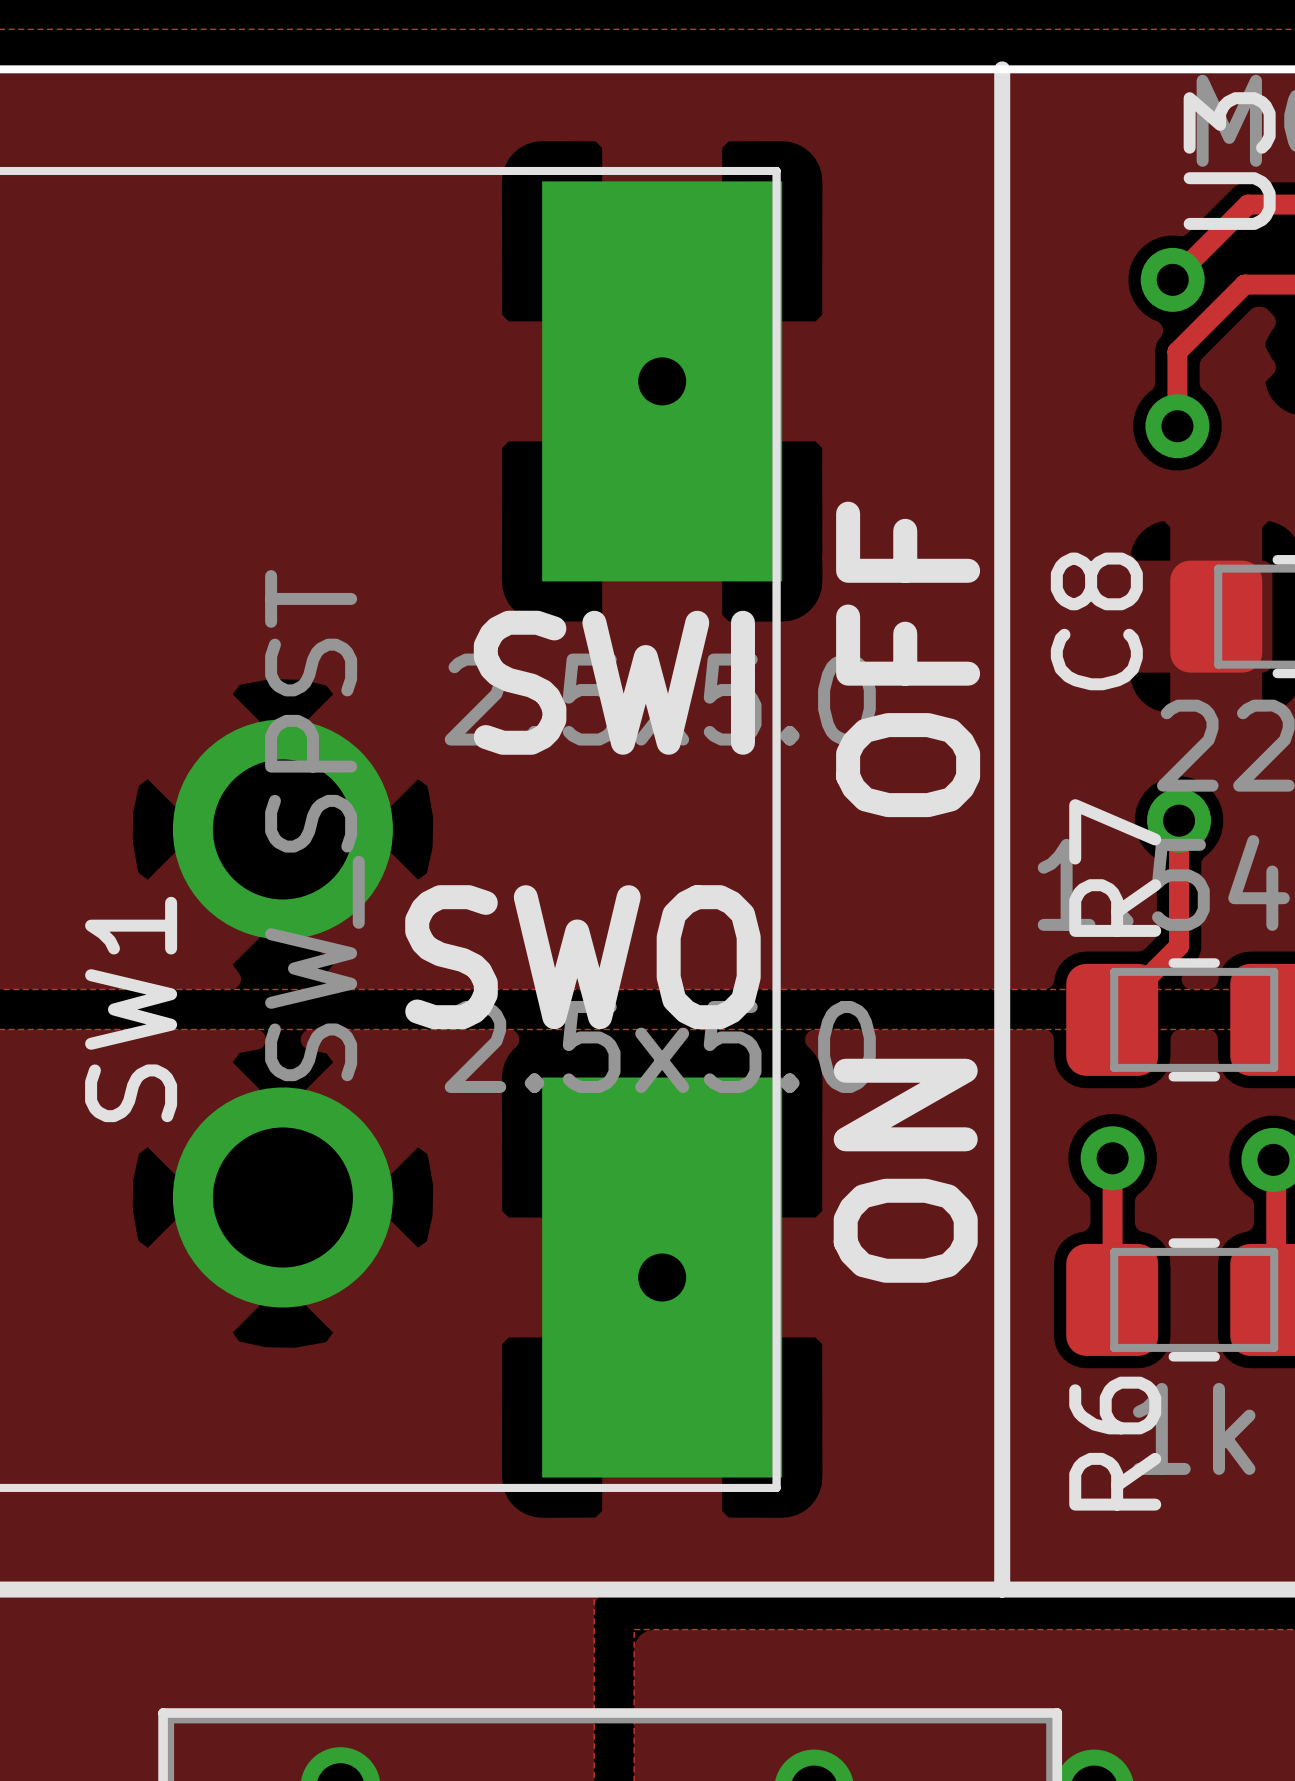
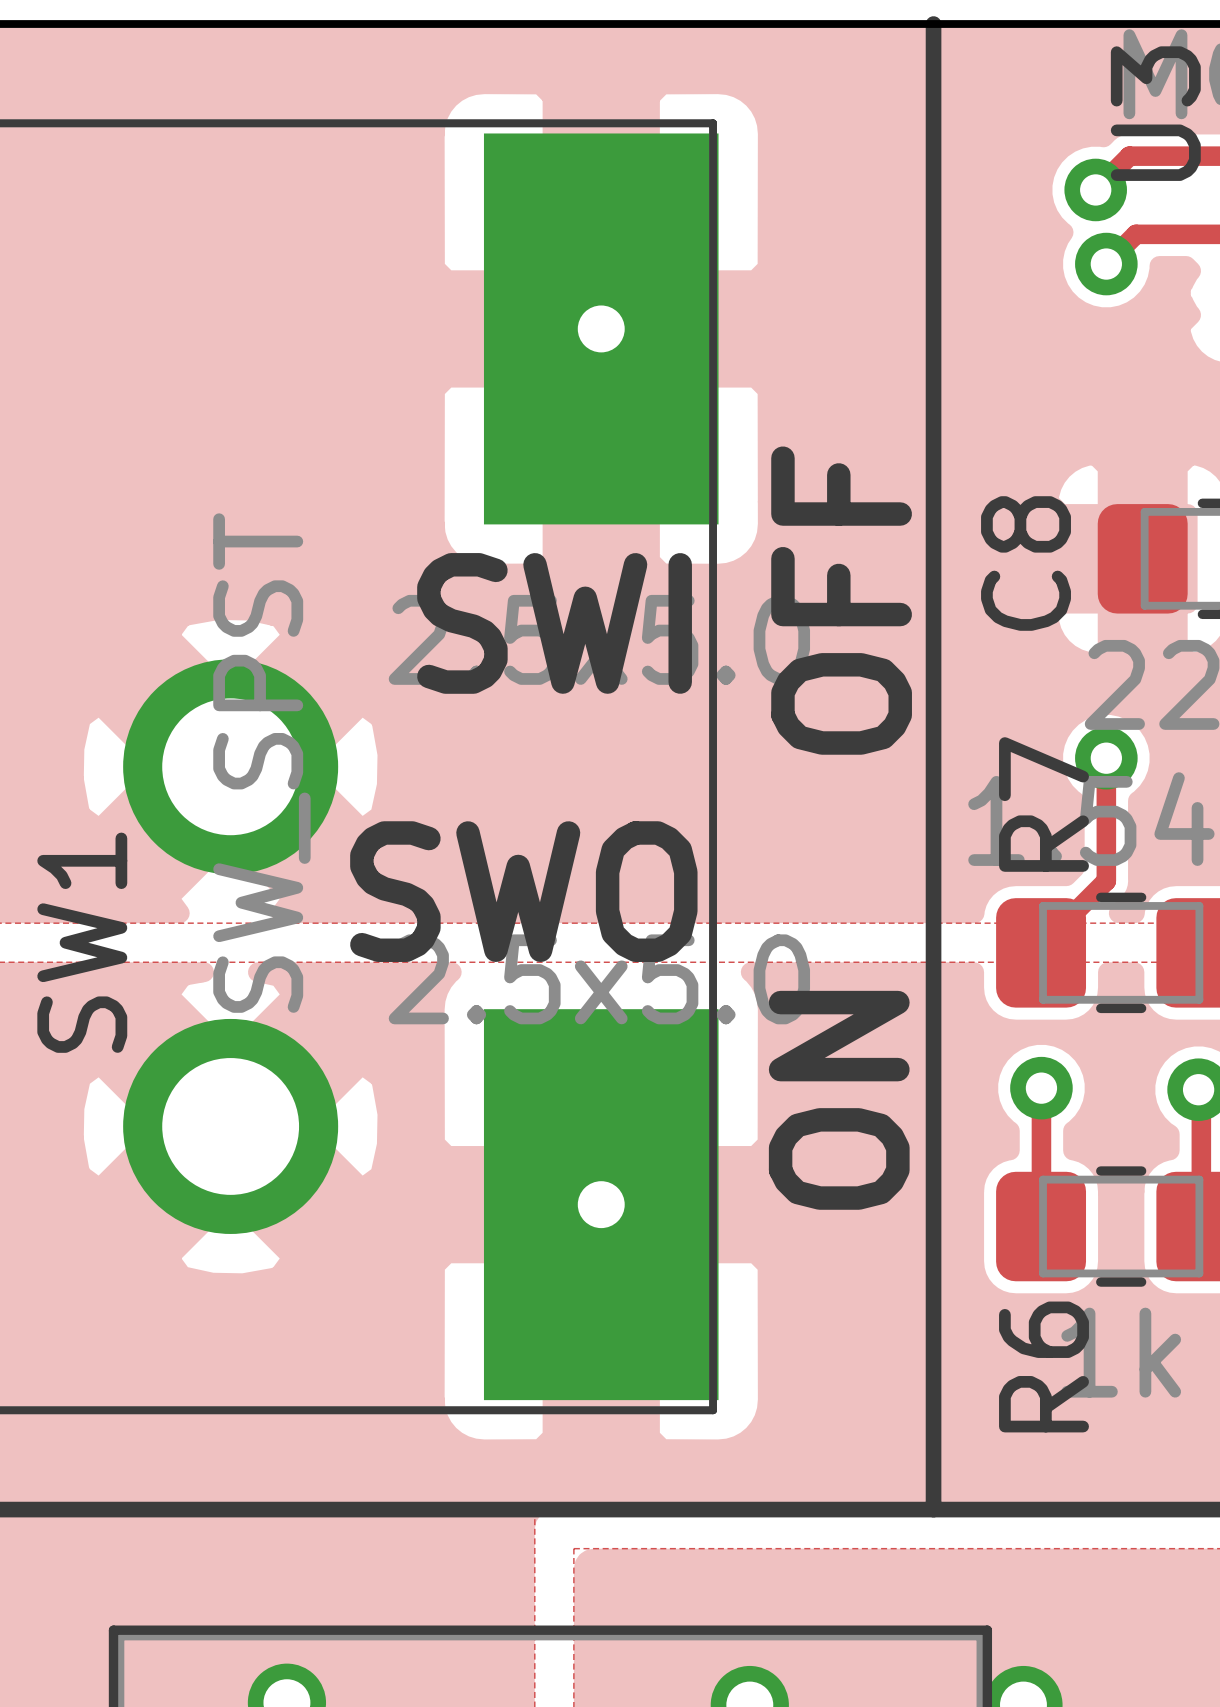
track: (1248, 204) (1172, 279) -> (1173, 156) (1129, 156) (1095, 189)
via: none -> (1095, 189)
via: (1172, 279) -> none
track: (1244, 284) (1177, 351) (1177, 426) -> (1170, 234) (1136, 234) (1106, 264)
via: none -> (1106, 264)
via: (1177, 426) -> none

